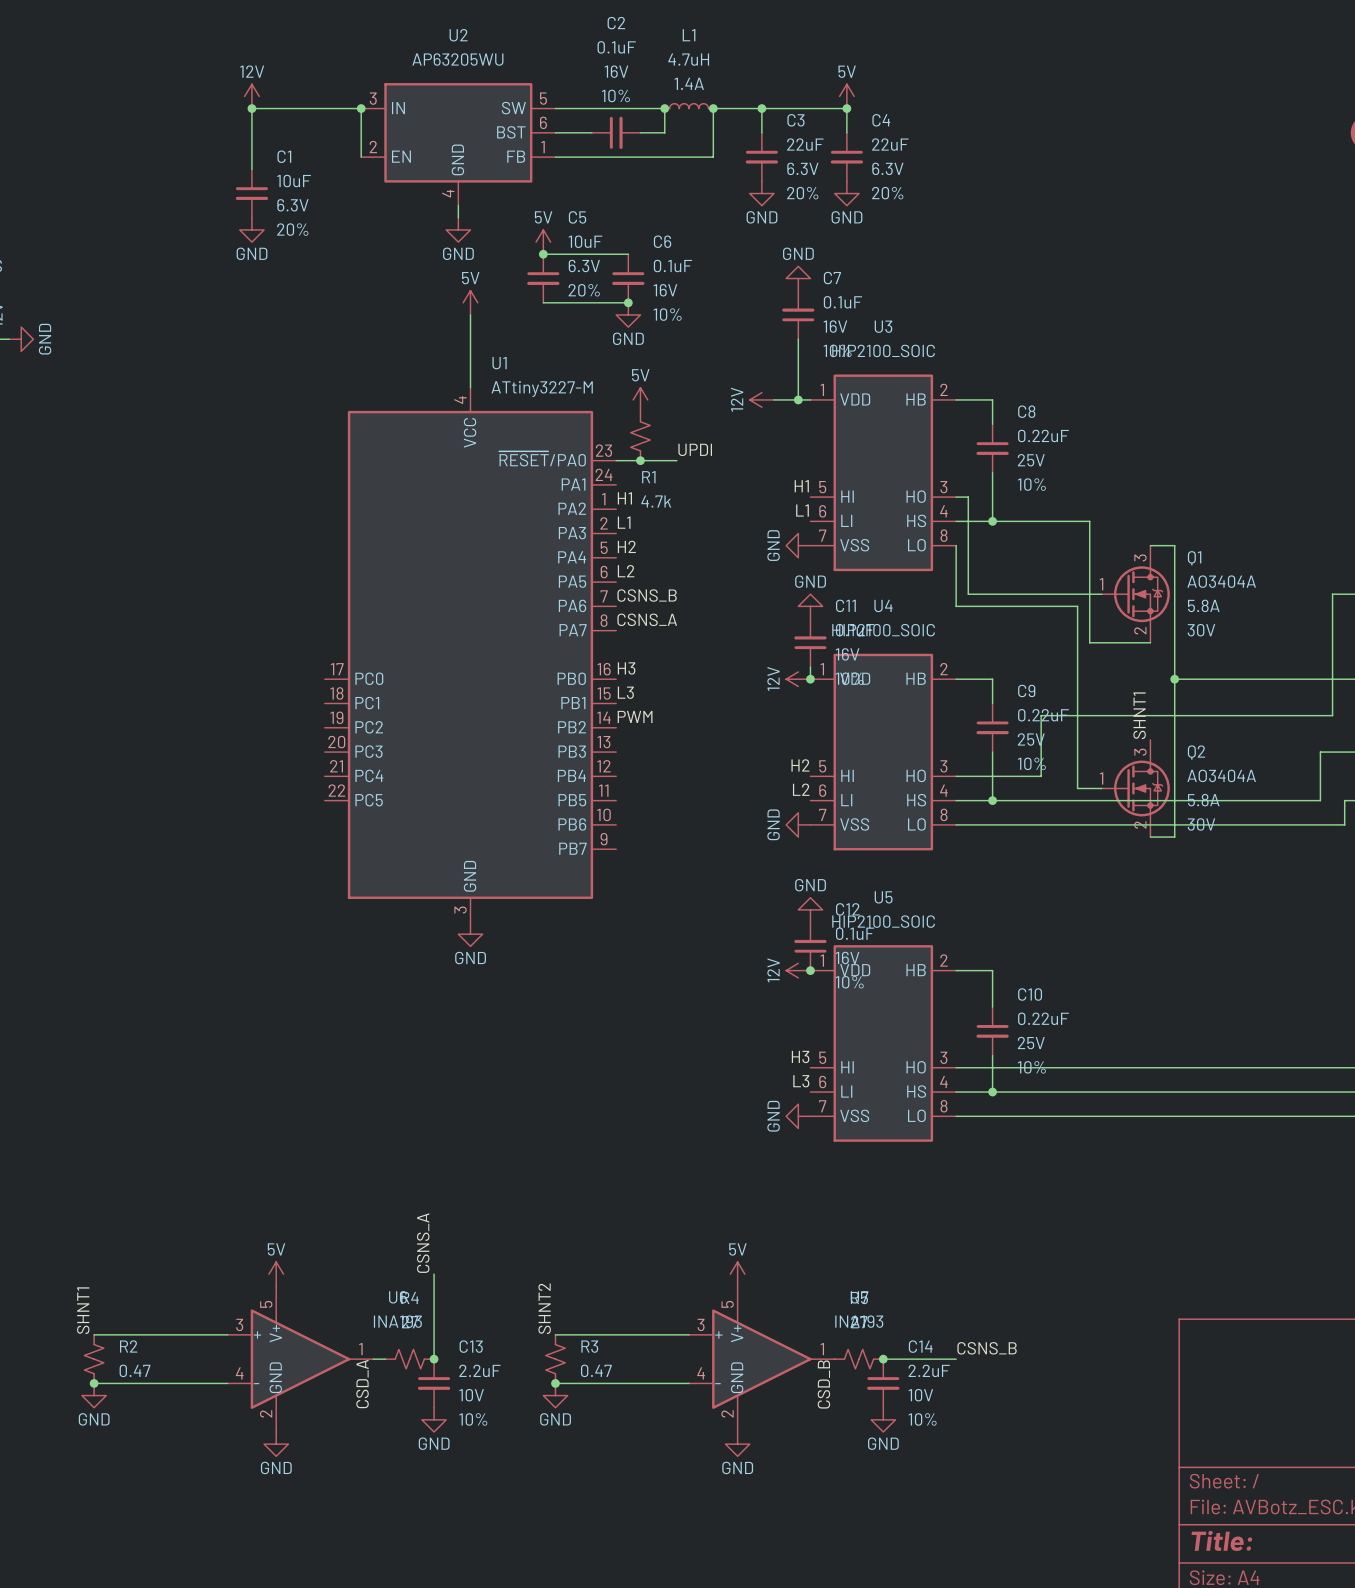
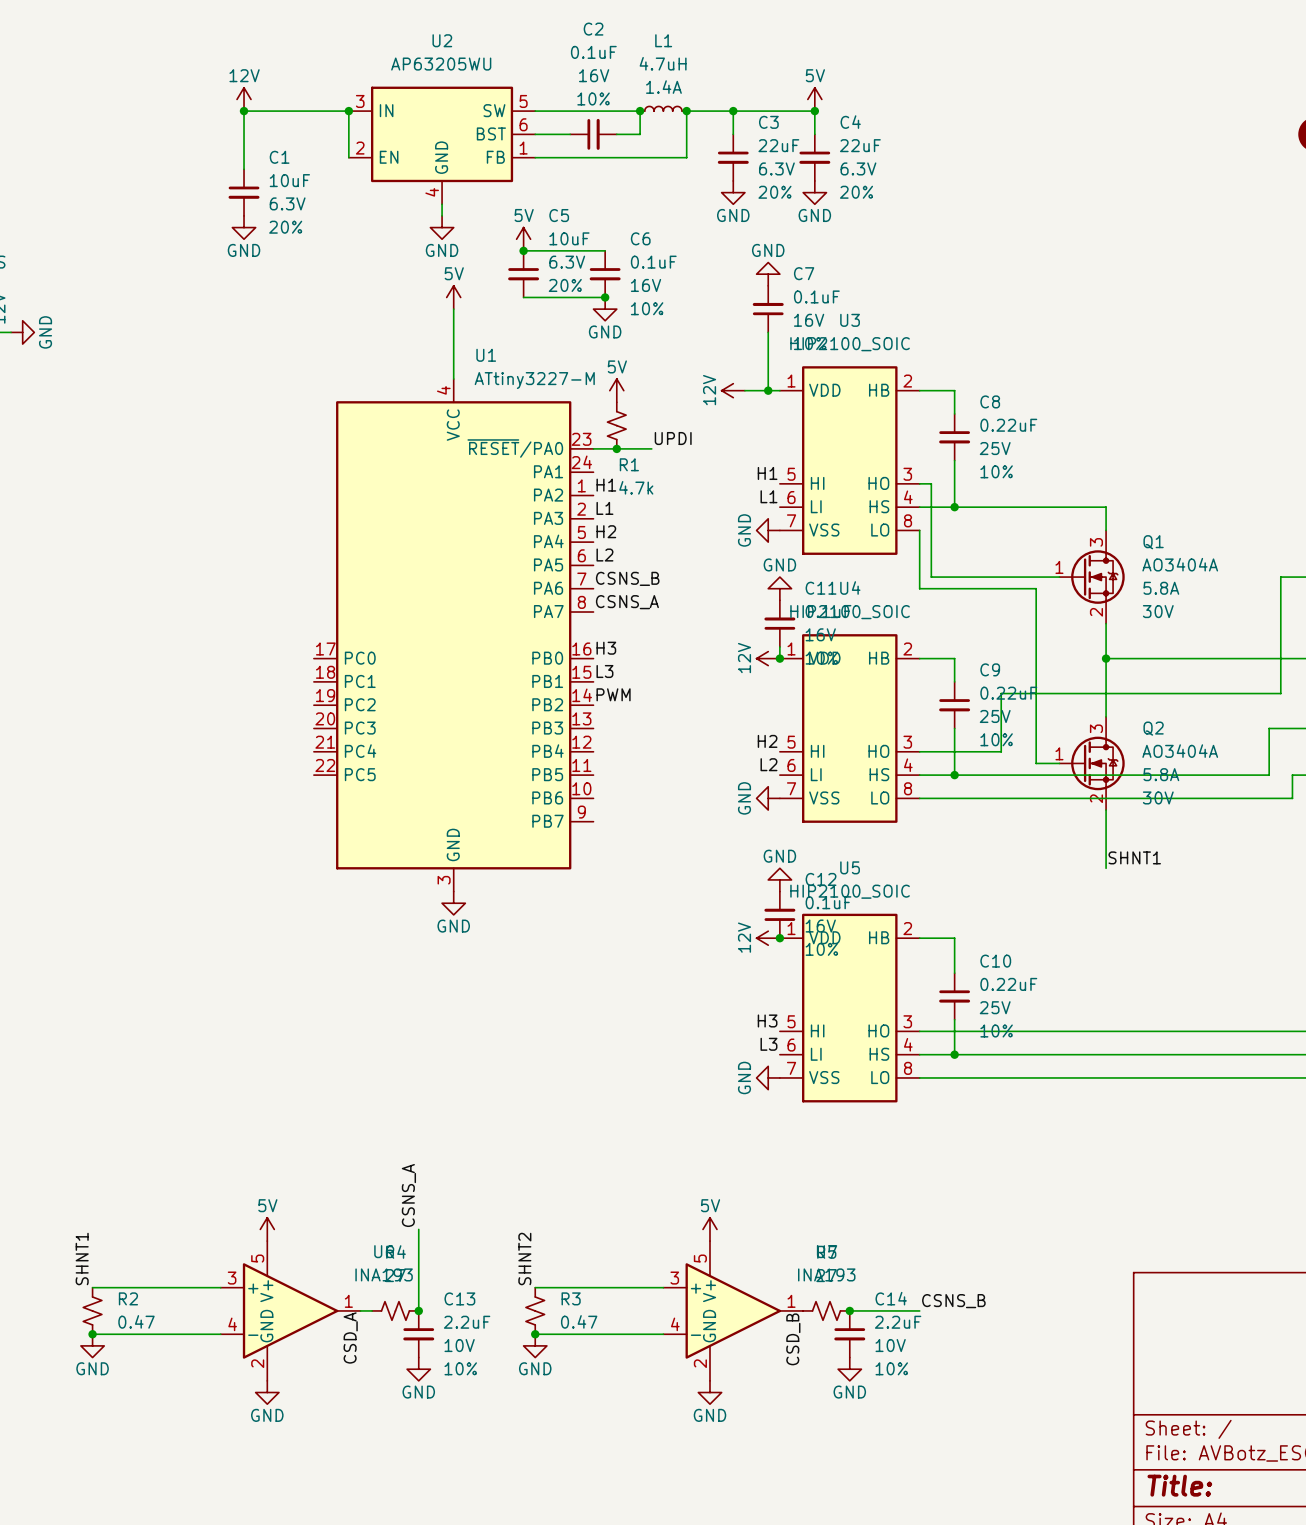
wire: (1089, 521) (1089, 642) (1150, 642) -> (1047, 507) (1106, 507) (1106, 530)
wire: (1150, 545) (1174, 545) (1174, 837) (1150, 837) -> (1106, 868) (1106, 810)
wire: none -> (1106, 623) (1106, 716)
wire: none -> (1106, 658) (1129, 658)
junction position: (1174, 679) -> (1106, 658)
label rotation: 0° (1139, 715) -> 90° clockwise (1134, 857)
label position: SHNT1 (1139, 715) -> SHNT1 (1134, 857)

